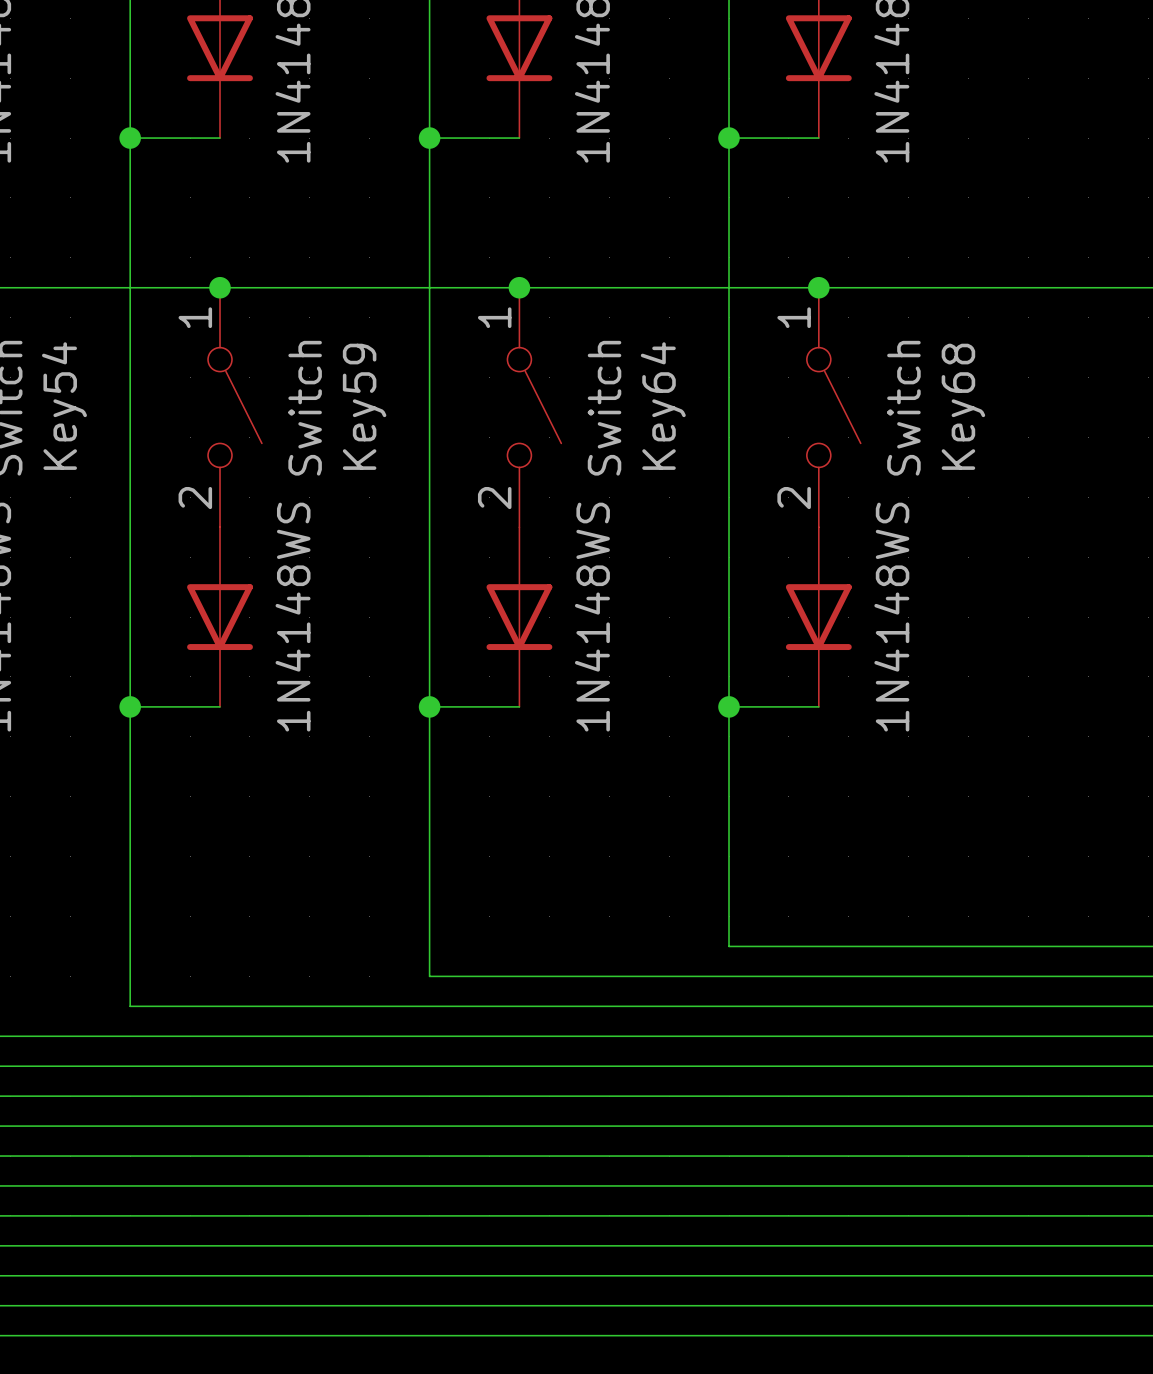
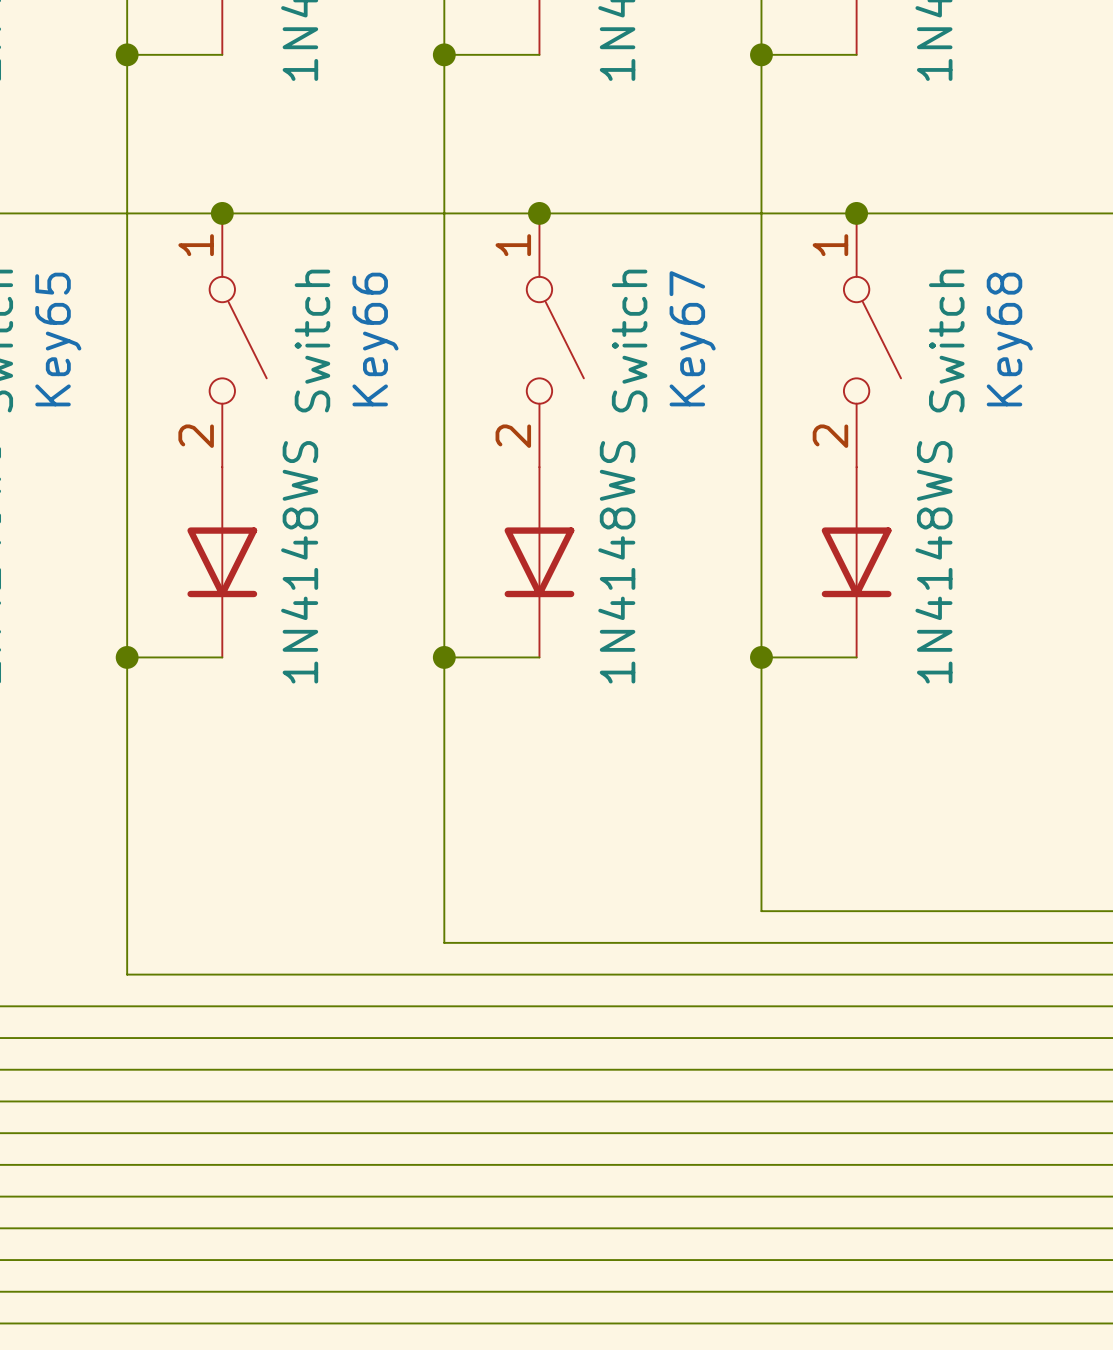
Key54 name: Key54 (64, 406) -> Key65 (58, 339)
Key59 name: Key59 (364, 406) -> Key66 (375, 339)
Key64 name: Key64 (663, 406) -> Key67 (692, 338)

